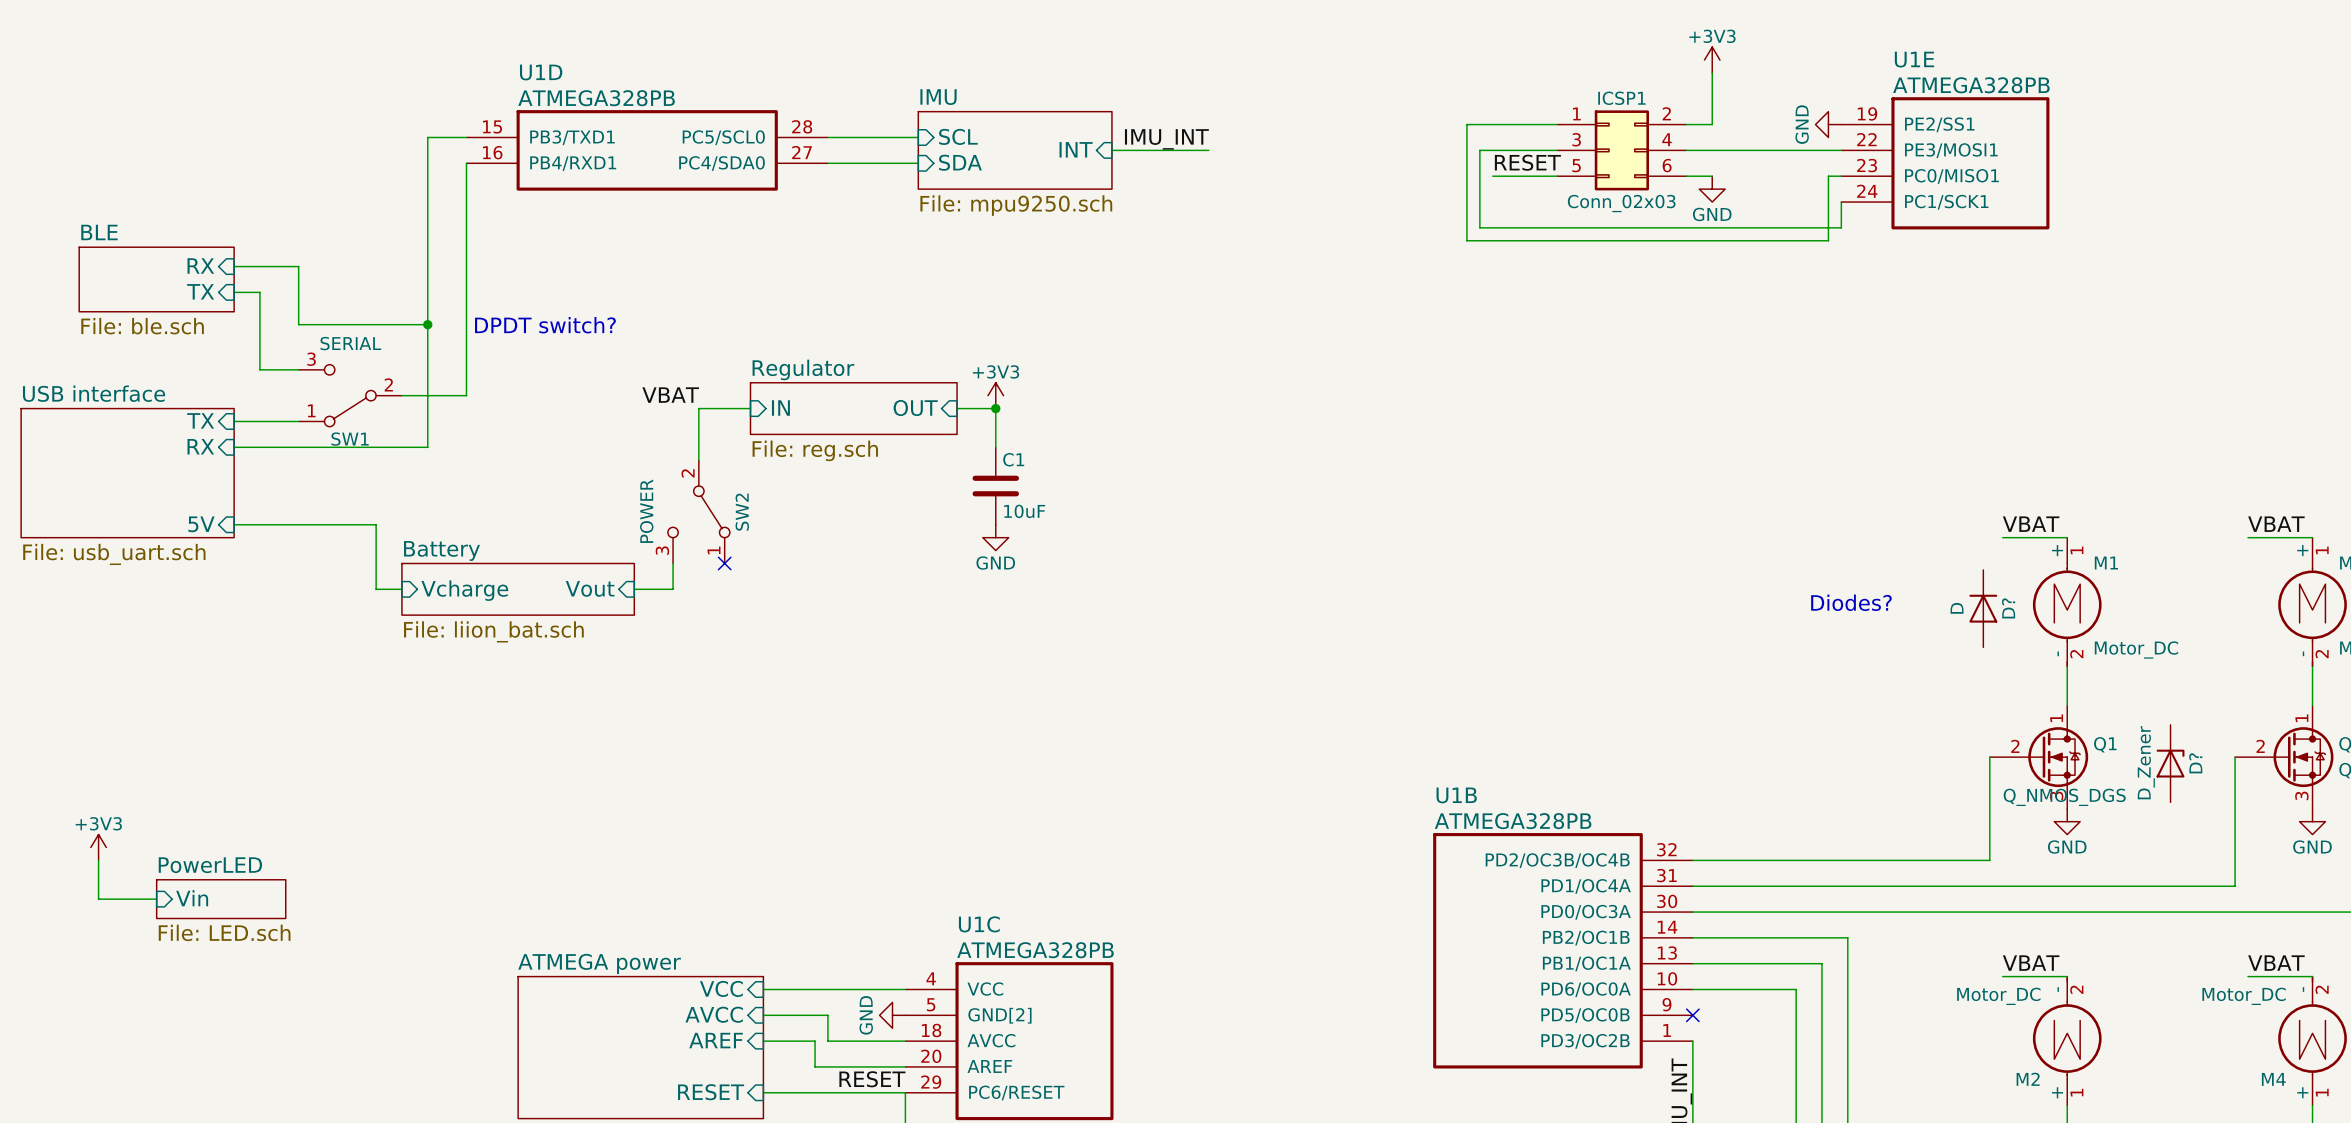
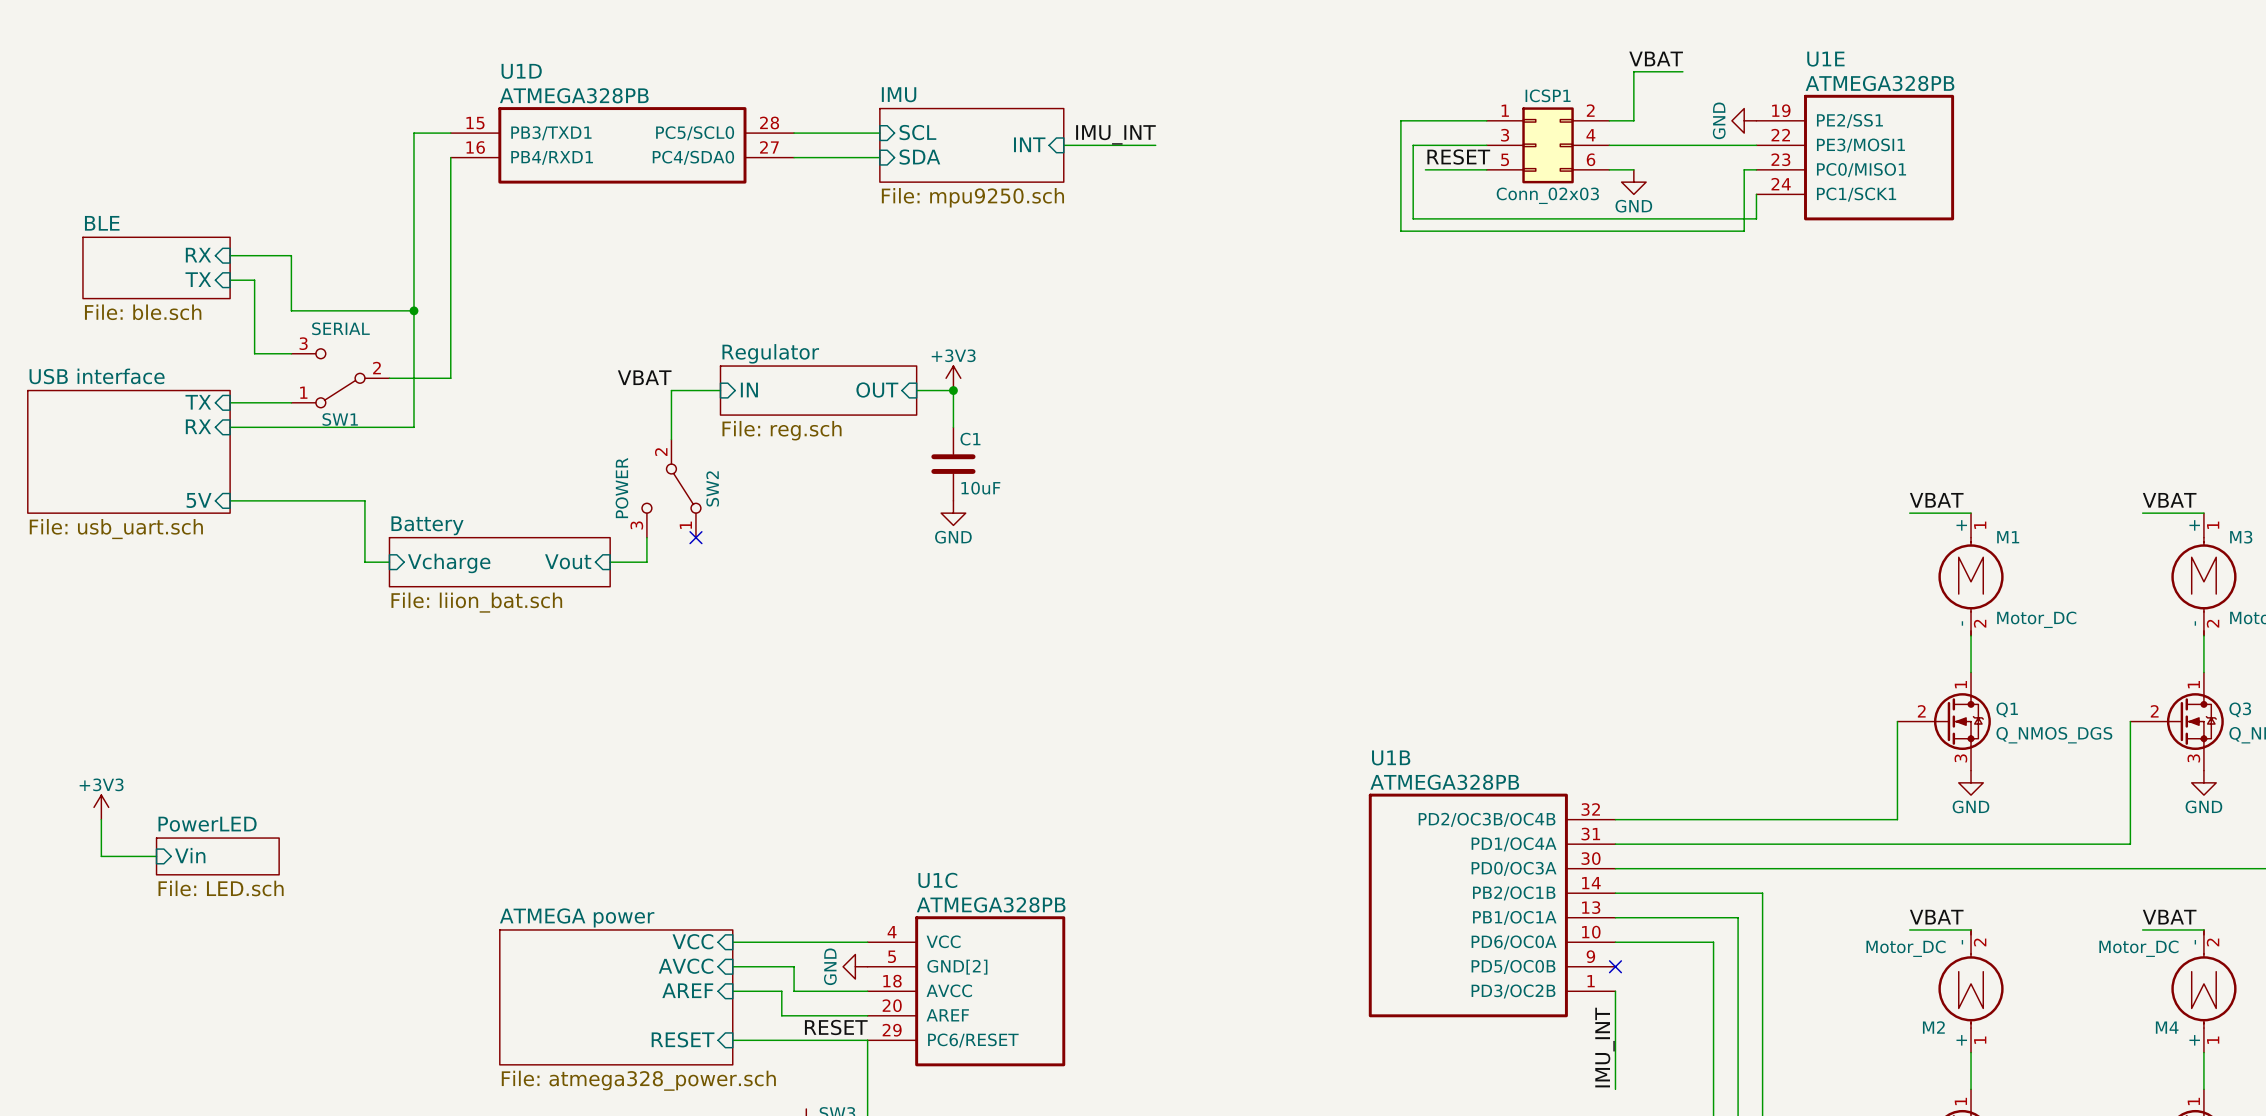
label: none -> VBAT (1656, 58)
power symbol: +3V3 (1712, 60) -> none
wire: none -> (1633, 71) (1682, 71)
text: DPDT switch? (545, 325) -> none
text: Diodes? (1851, 602) -> none
D?: D (1983, 608) -> none
D?: D_Zener (2170, 763) -> none
Q1 value position: Q_NMOS_DGS (2064, 797) -> Q_NMOS_DGS (2054, 735)

